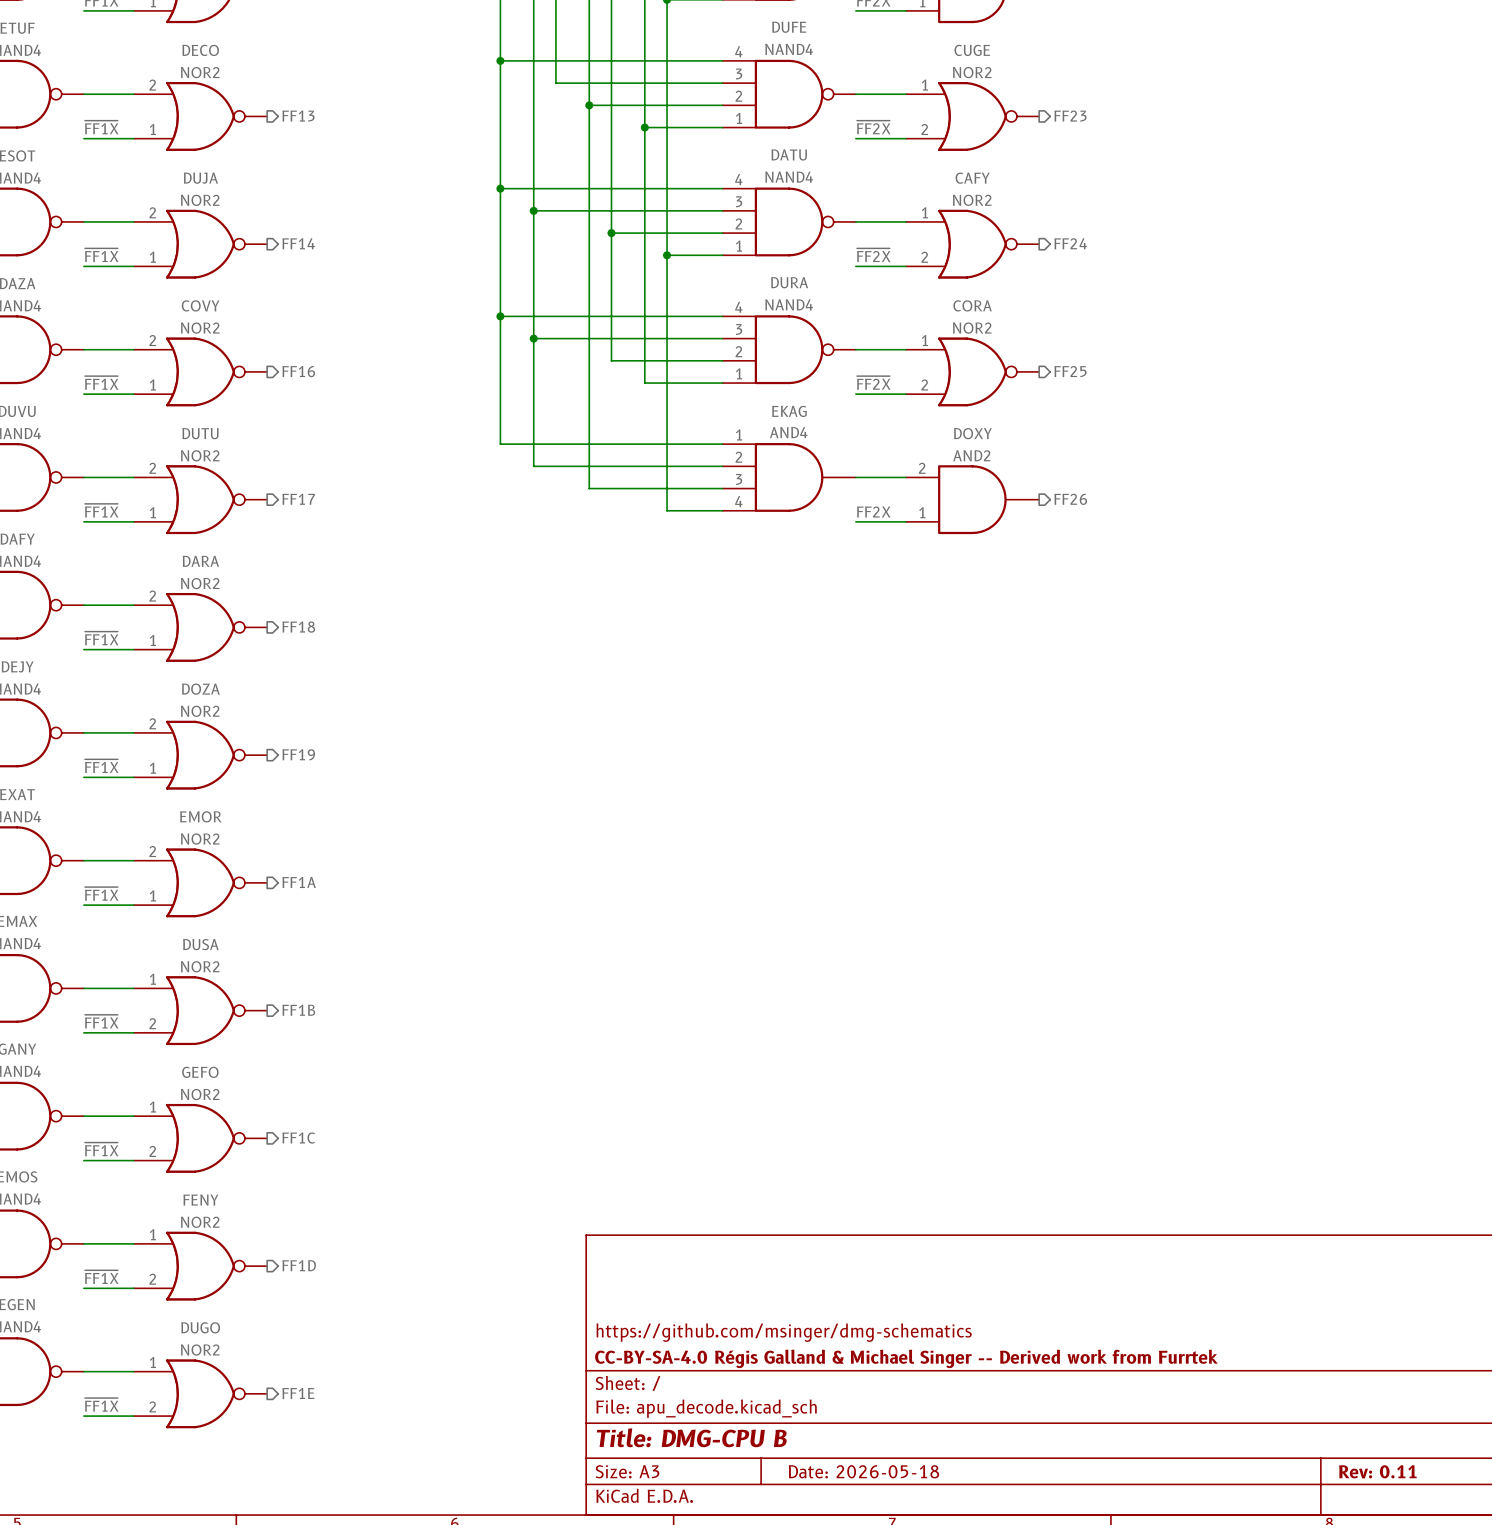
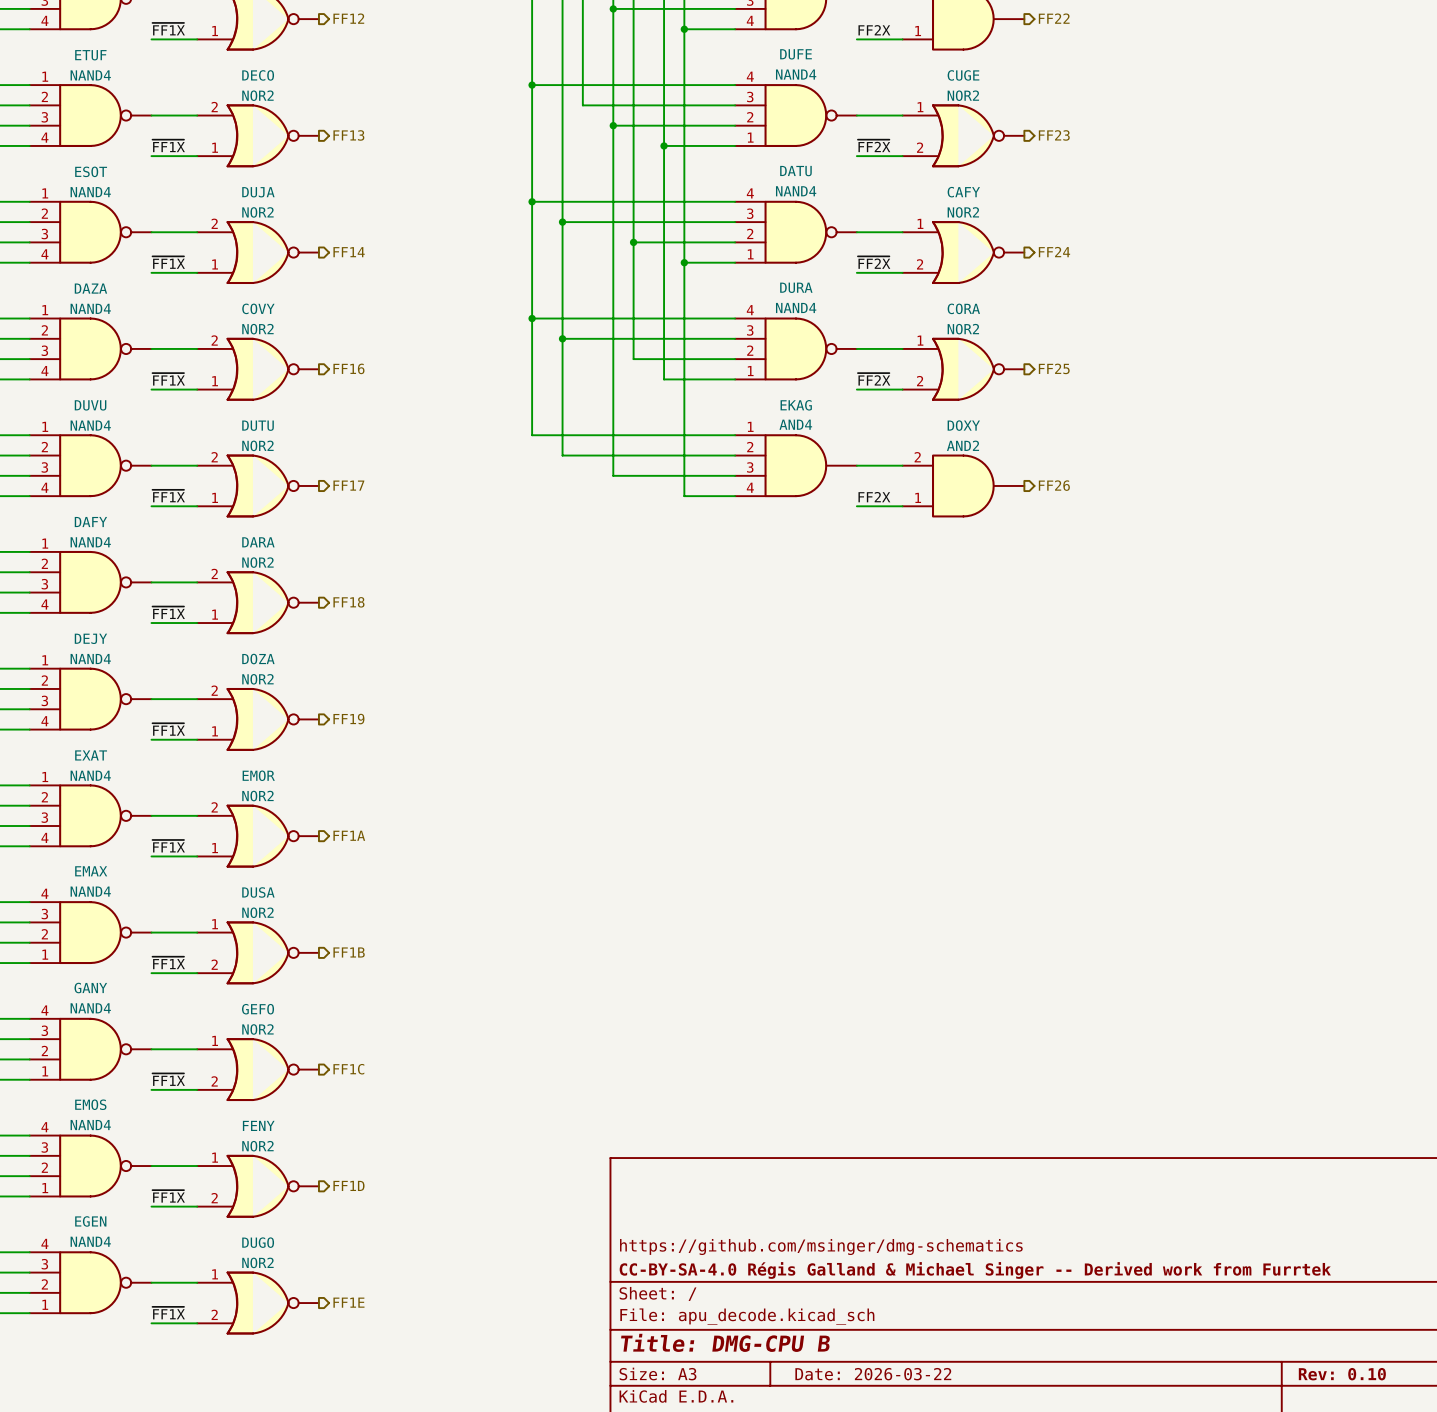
title block: Date: 2026-05-18 (863, 1471) -> Date: 2026-03-22 (873, 1374)
title block: Rev: 0.11 (1377, 1471) -> Rev: 0.10 (1342, 1374)

